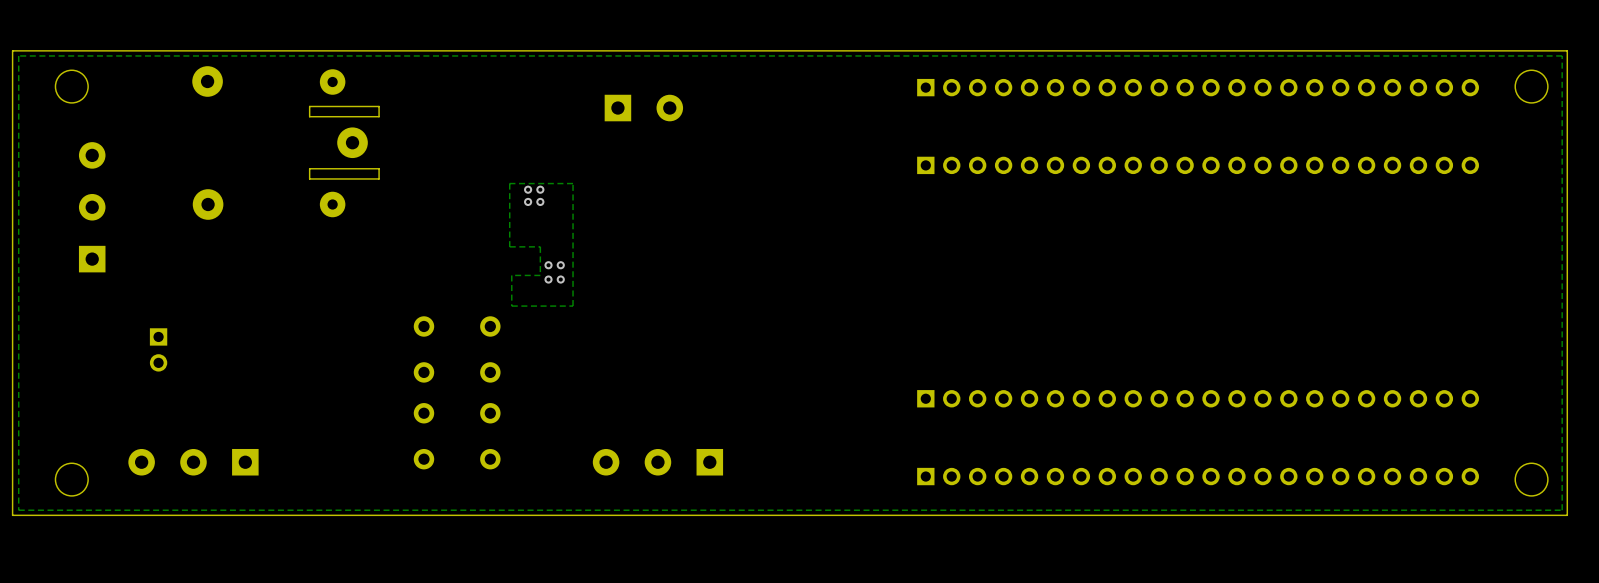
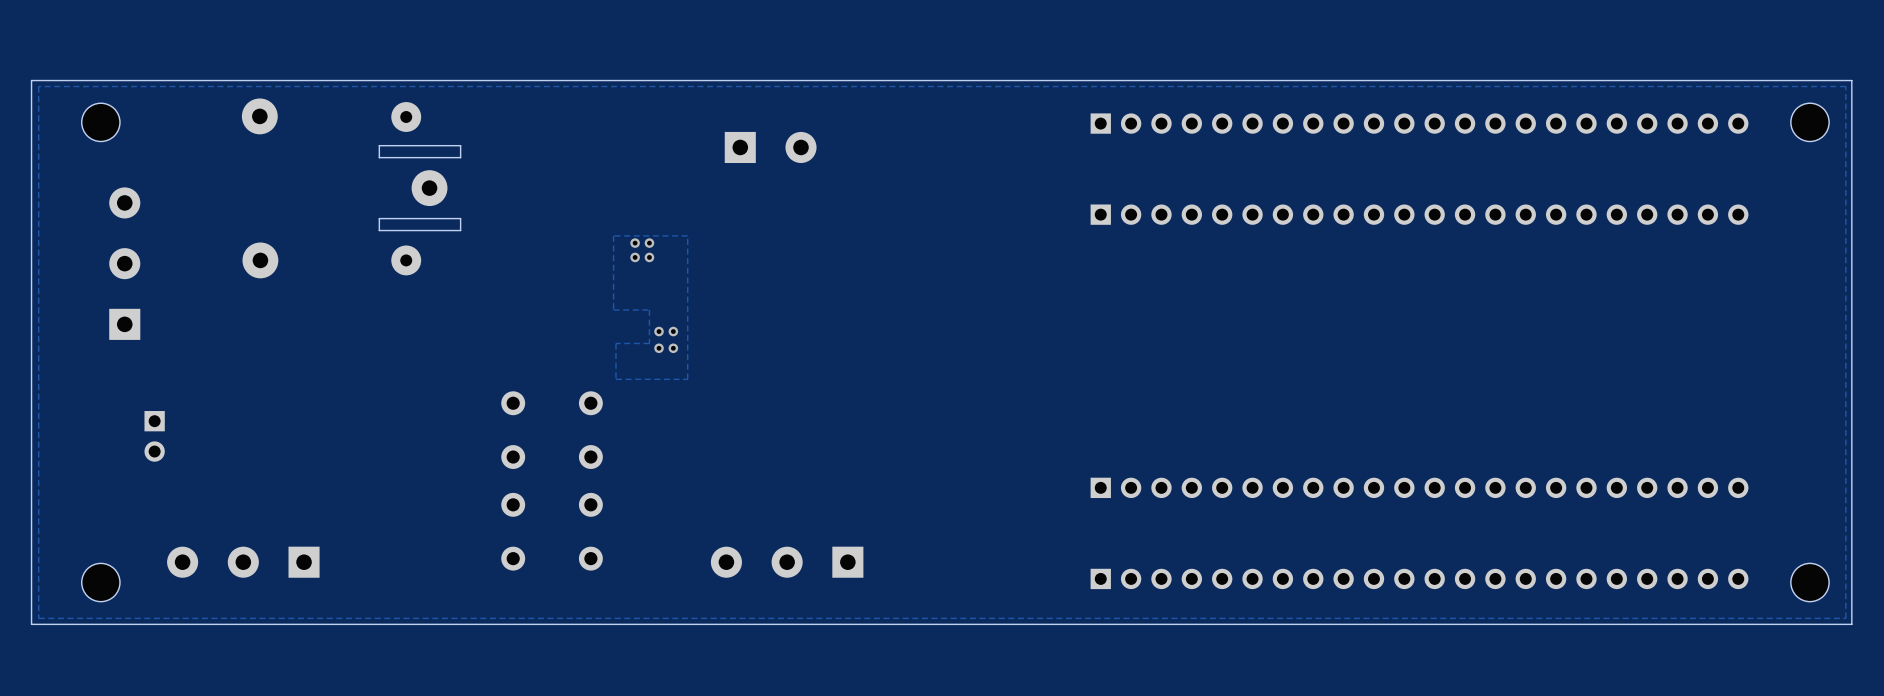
part position: (158, 349) -> (154, 436)

